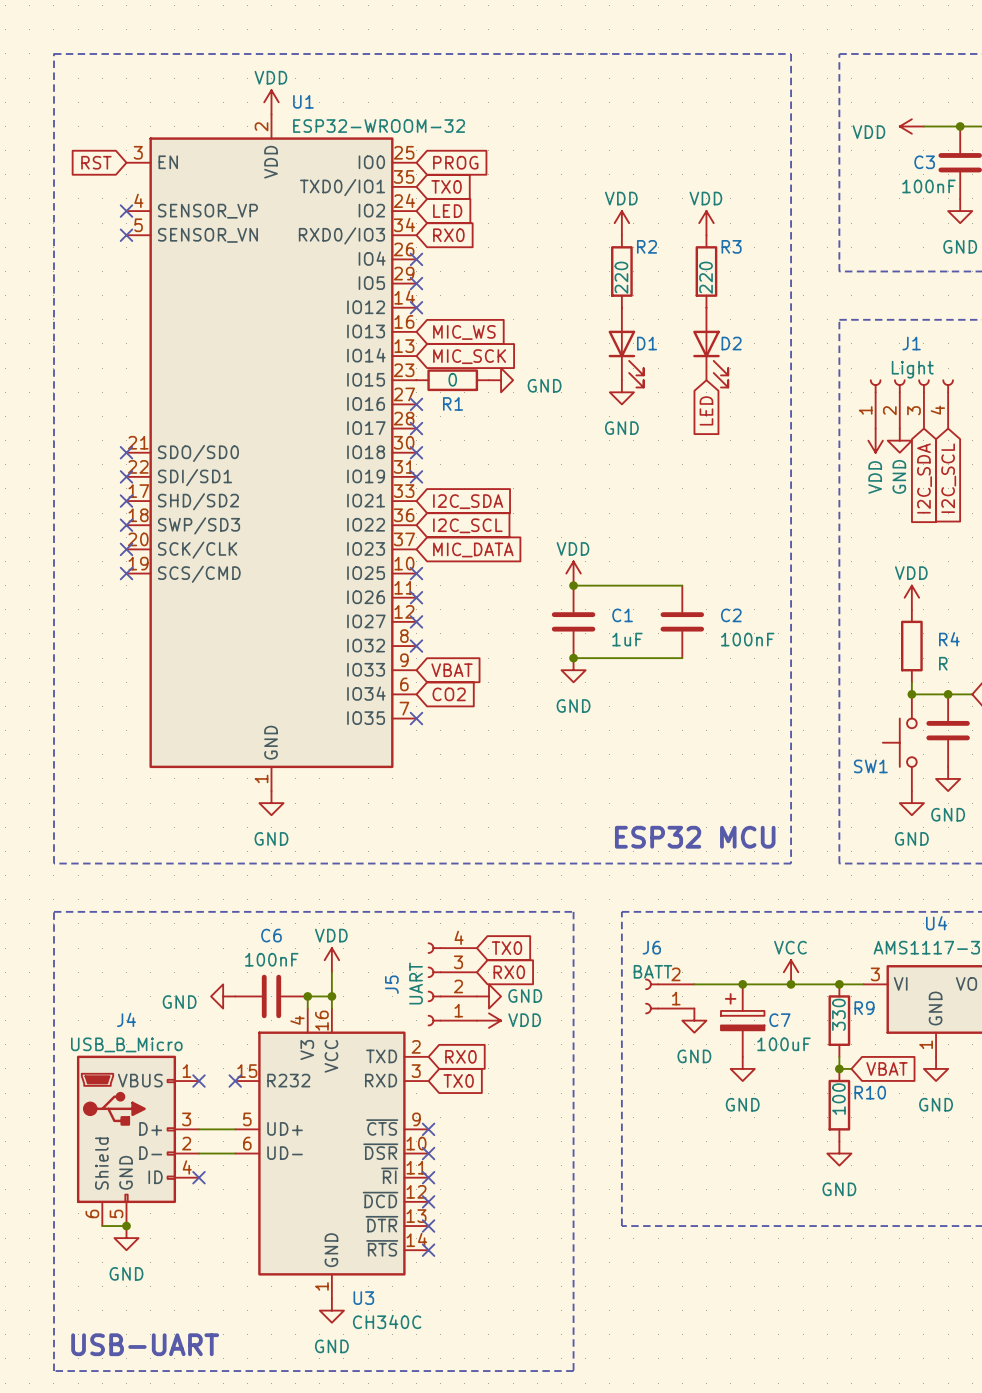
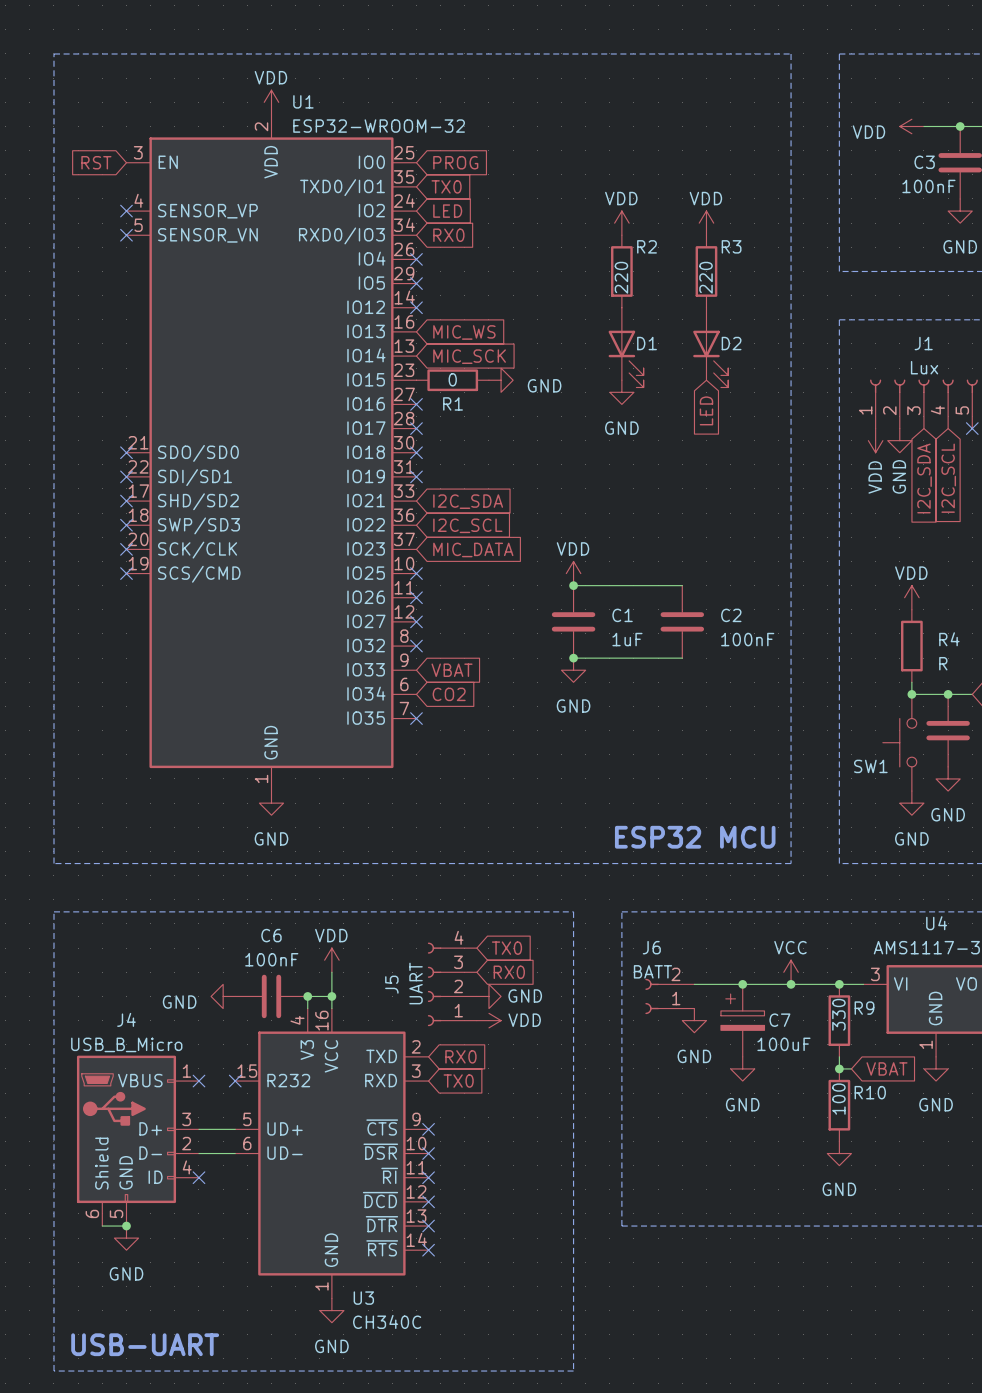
J1 value: Light (912, 369) -> Lux (924, 367)
J1 symbol: [870, 379, 954, 429] -> [870, 379, 978, 429]
no-connect mark: none -> (972, 428)

